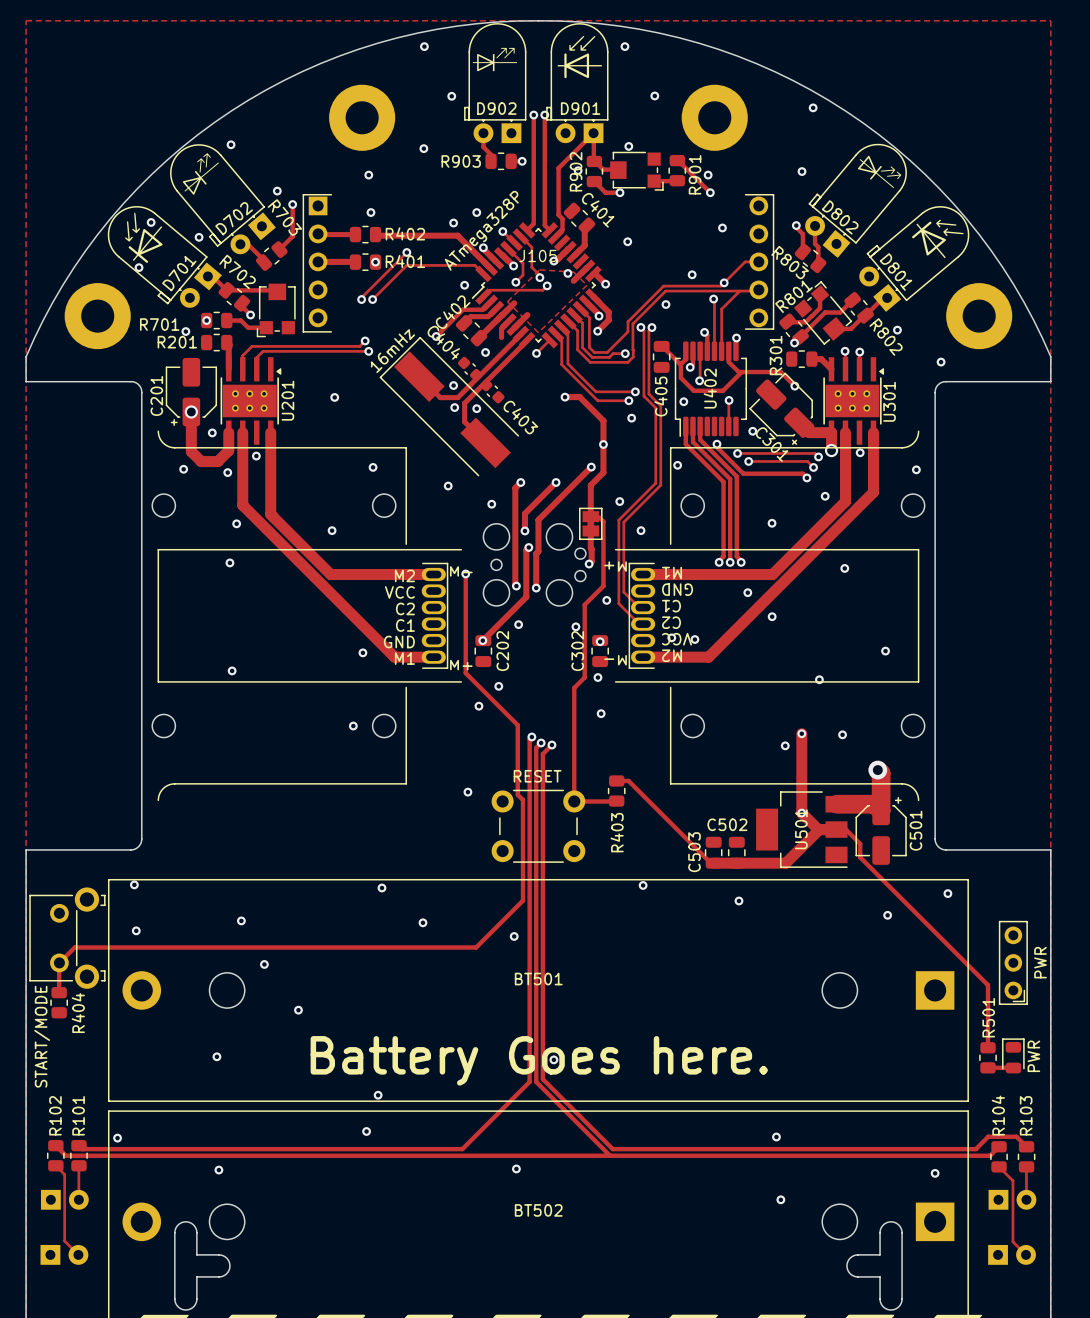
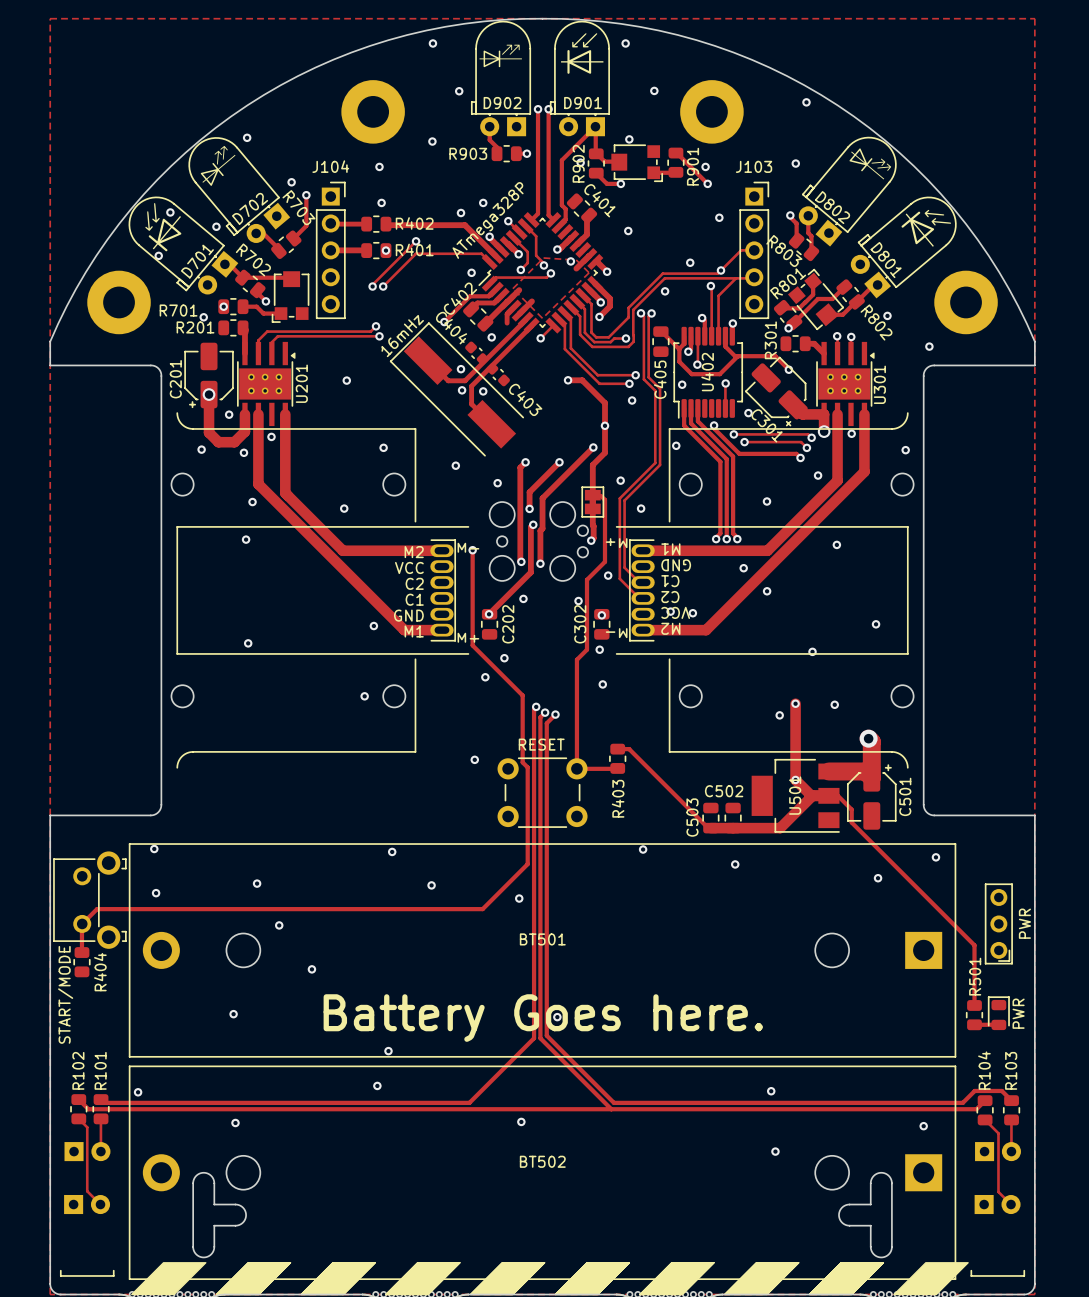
J104: none -> (330, 250)
J103: none -> (754, 250)
J105: (538, 263) -> none

